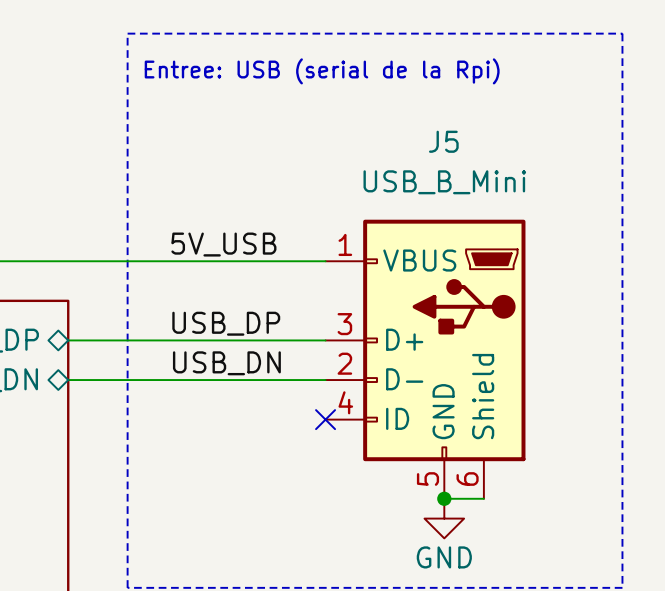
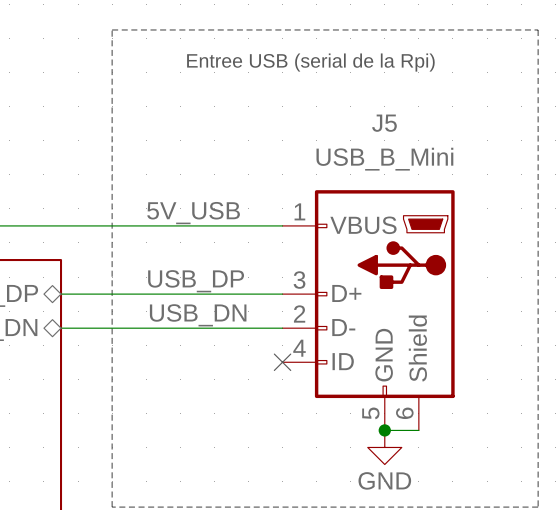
text: Entree: USB (serial de la Rpi) (322, 71) -> Entree USB (serial de la Rpi) (310, 62)

